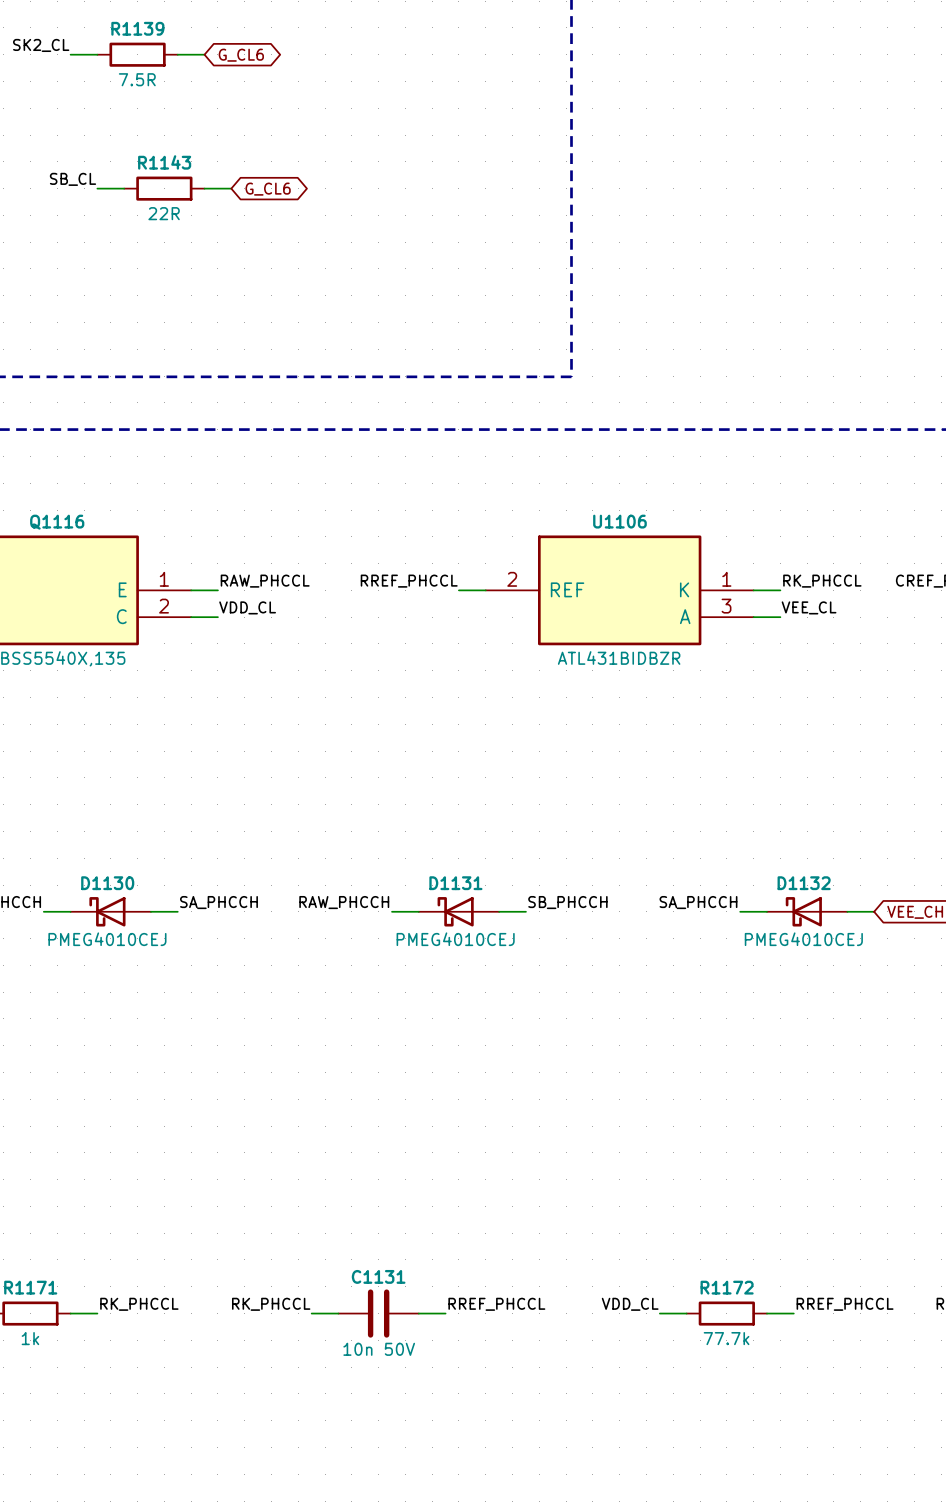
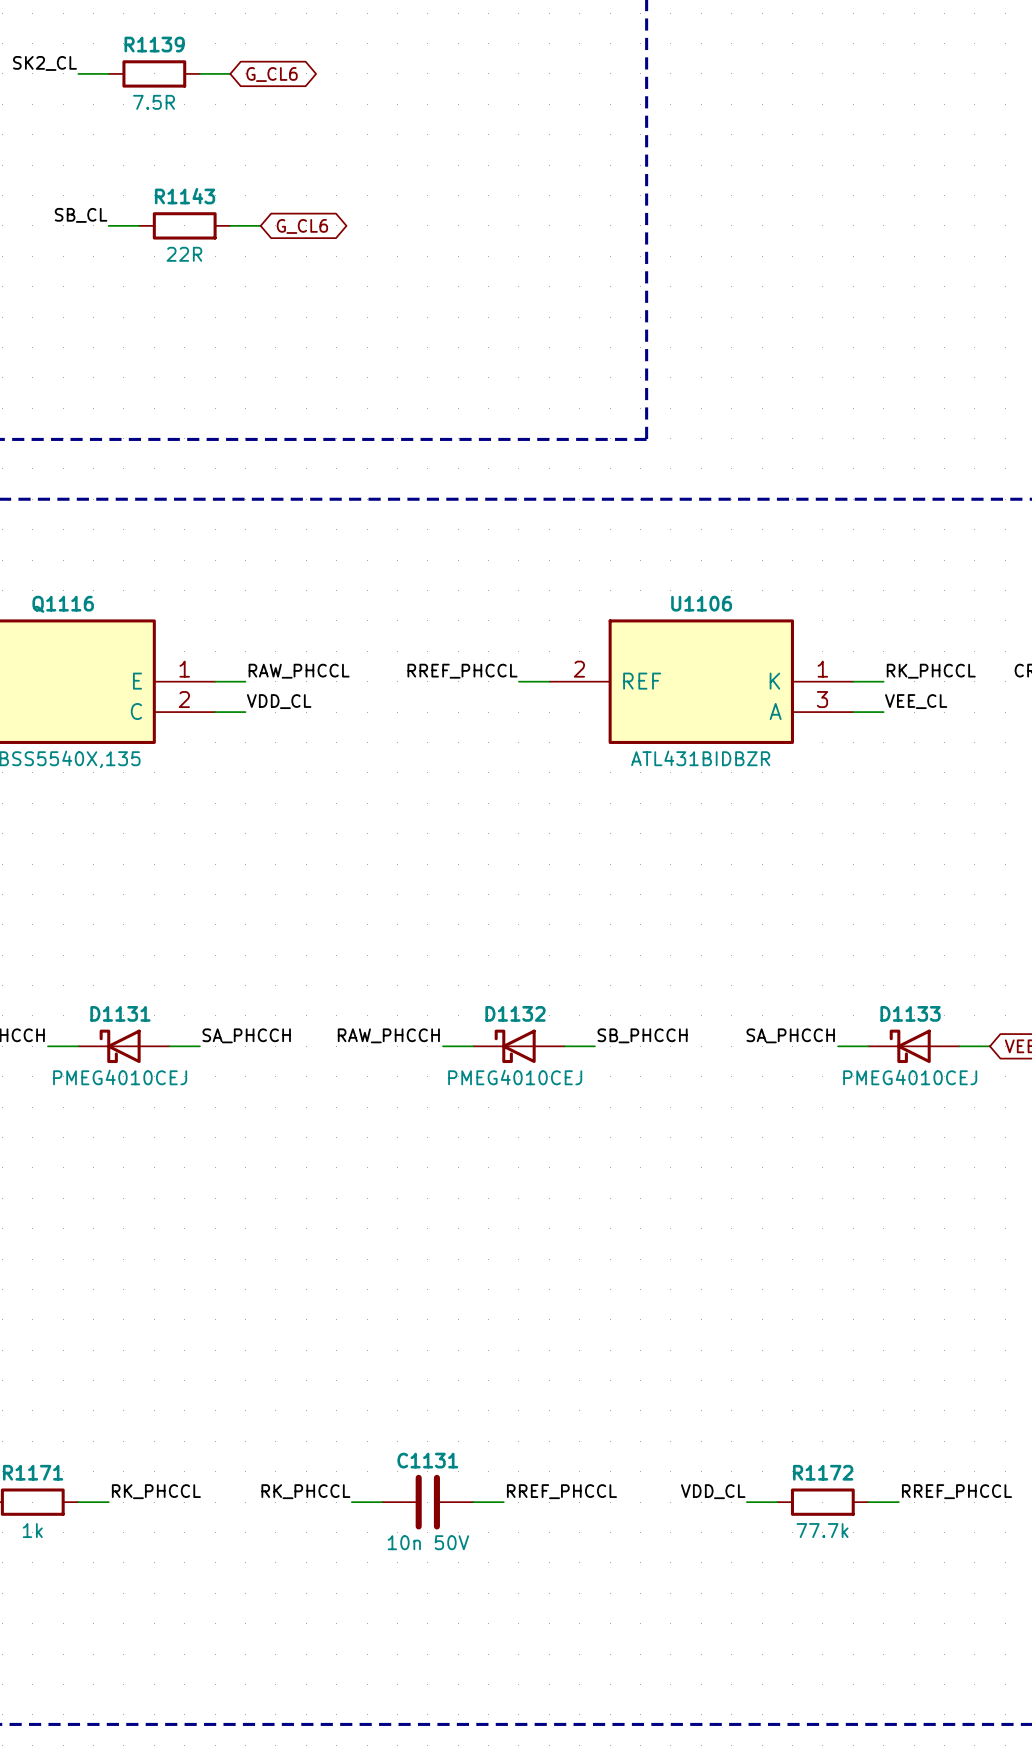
D1130 name: D1130 (107, 883) -> D1131 (120, 1013)
D1131 name: D1131 (455, 883) -> D1132 (515, 1013)
D1132 name: D1132 (804, 883) -> D1133 (910, 1013)

